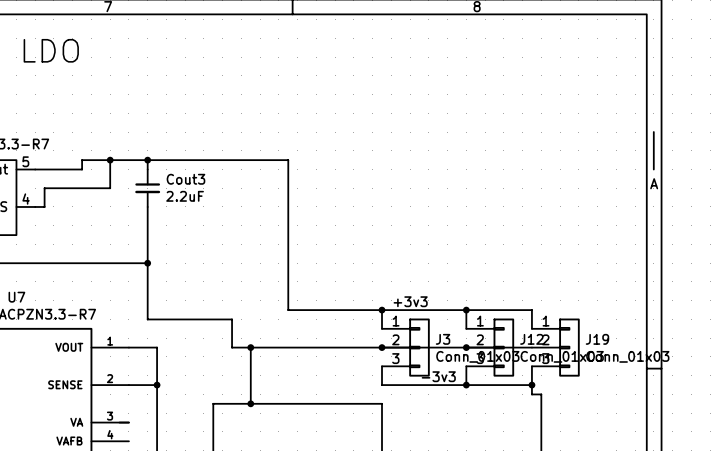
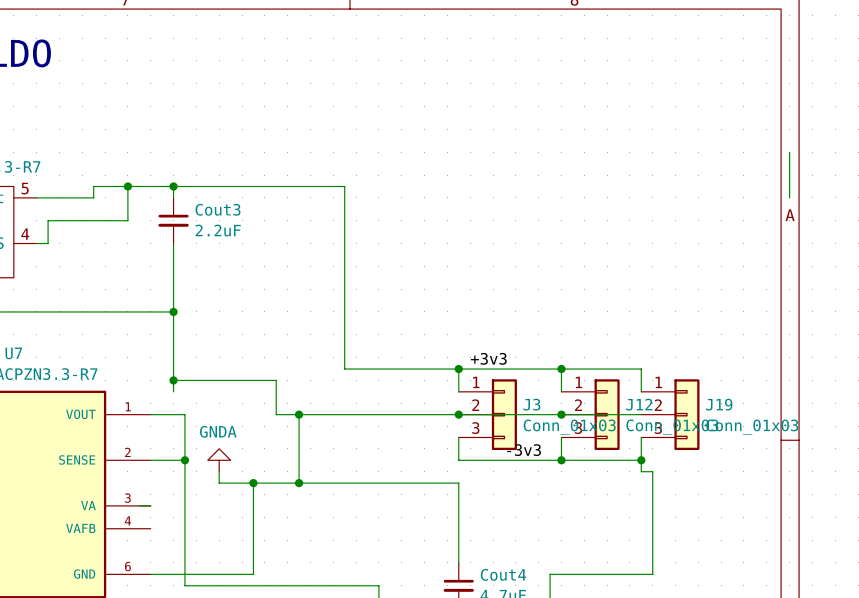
wire: none -> (173, 380) (173, 391)
junction: none -> (173, 380)
power symbol: none -> GNDA (219, 460)
wire: none -> (219, 471) (219, 483) (253, 483)
junction: none -> (253, 483)

